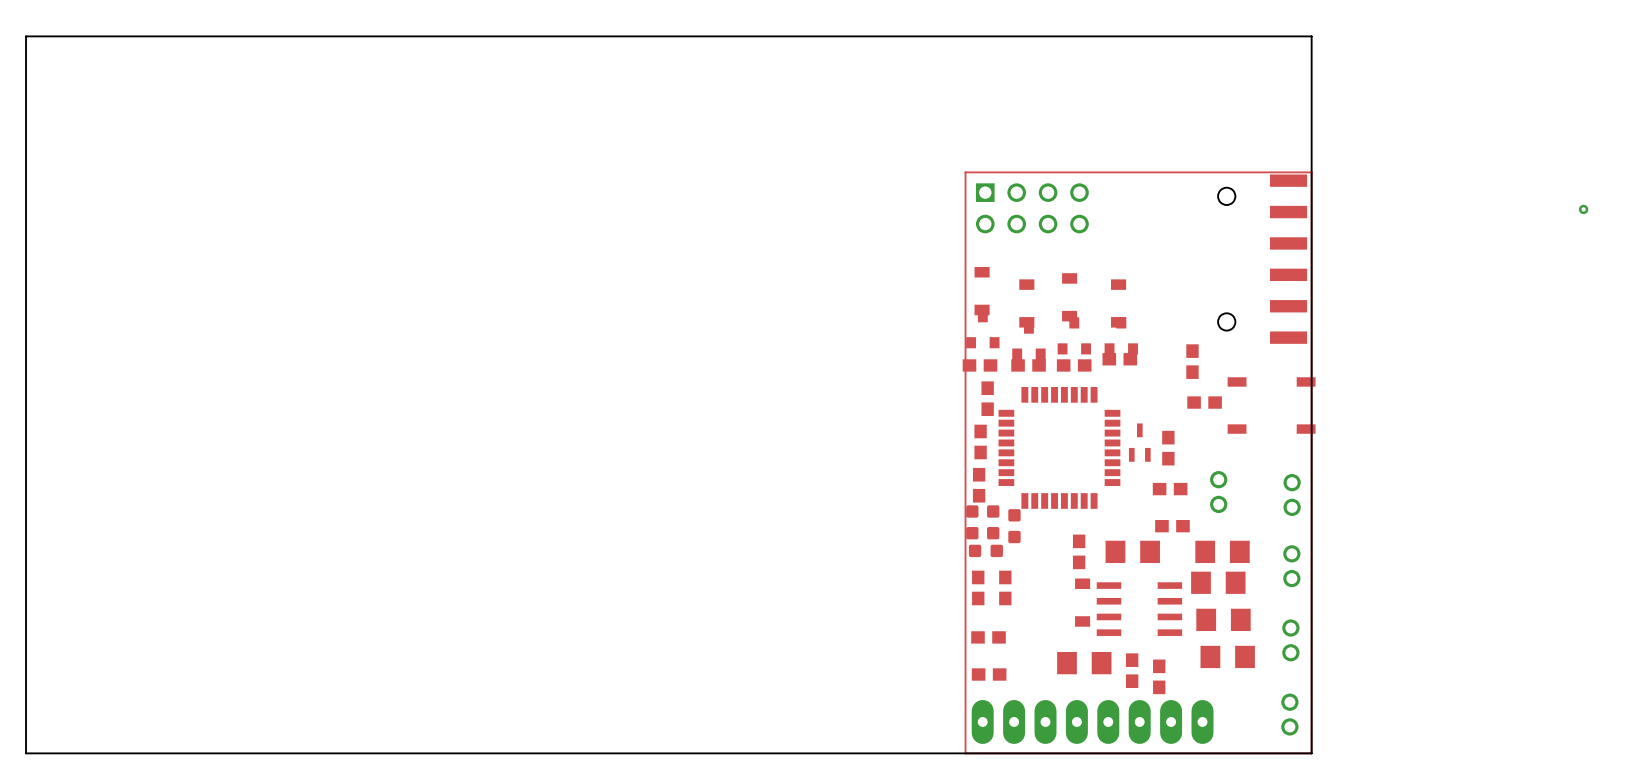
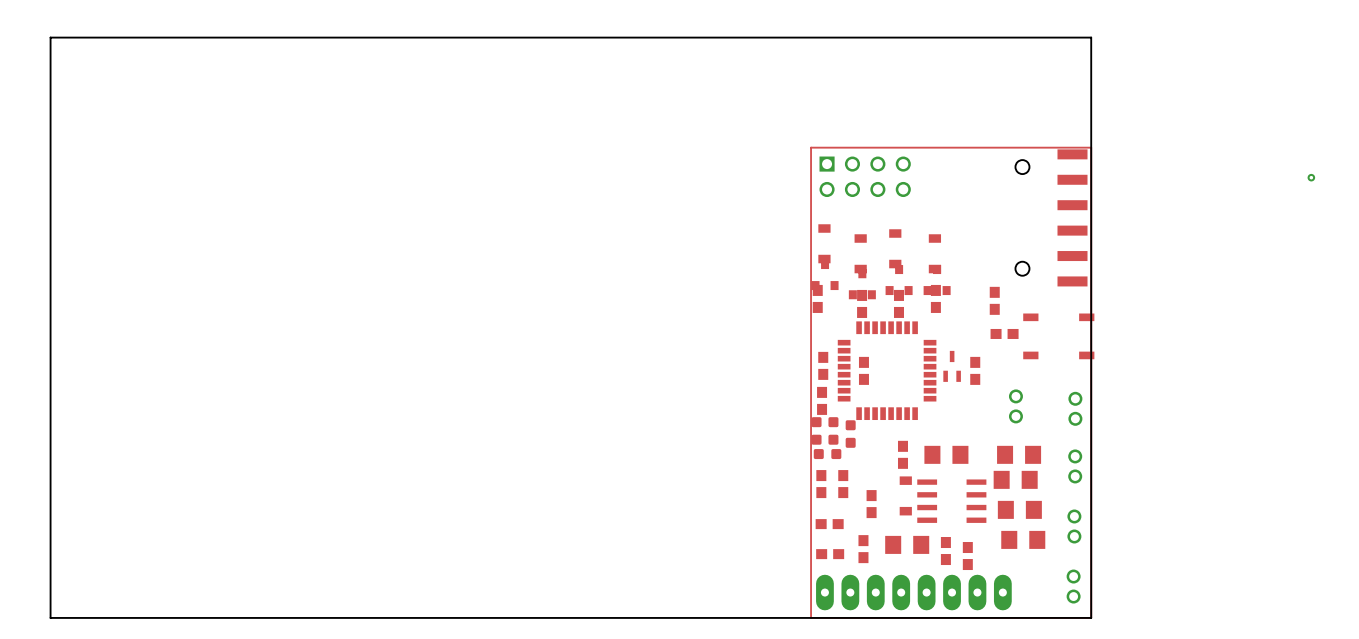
part rotation: 0° (1119, 359) -> 90° clockwise (935, 298)
part rotation: 0° (979, 365) -> 90° clockwise (817, 298)
part rotation: 0° (1028, 365) -> 90° clockwise (862, 303)
part rotation: 0° (1074, 365) -> 90° clockwise (898, 303)
part position: (987, 398) -> (863, 370)
part: (1170, 489) -> none
part: (1172, 526) -> none
part: none -> (871, 504)
part: none -> (863, 549)

